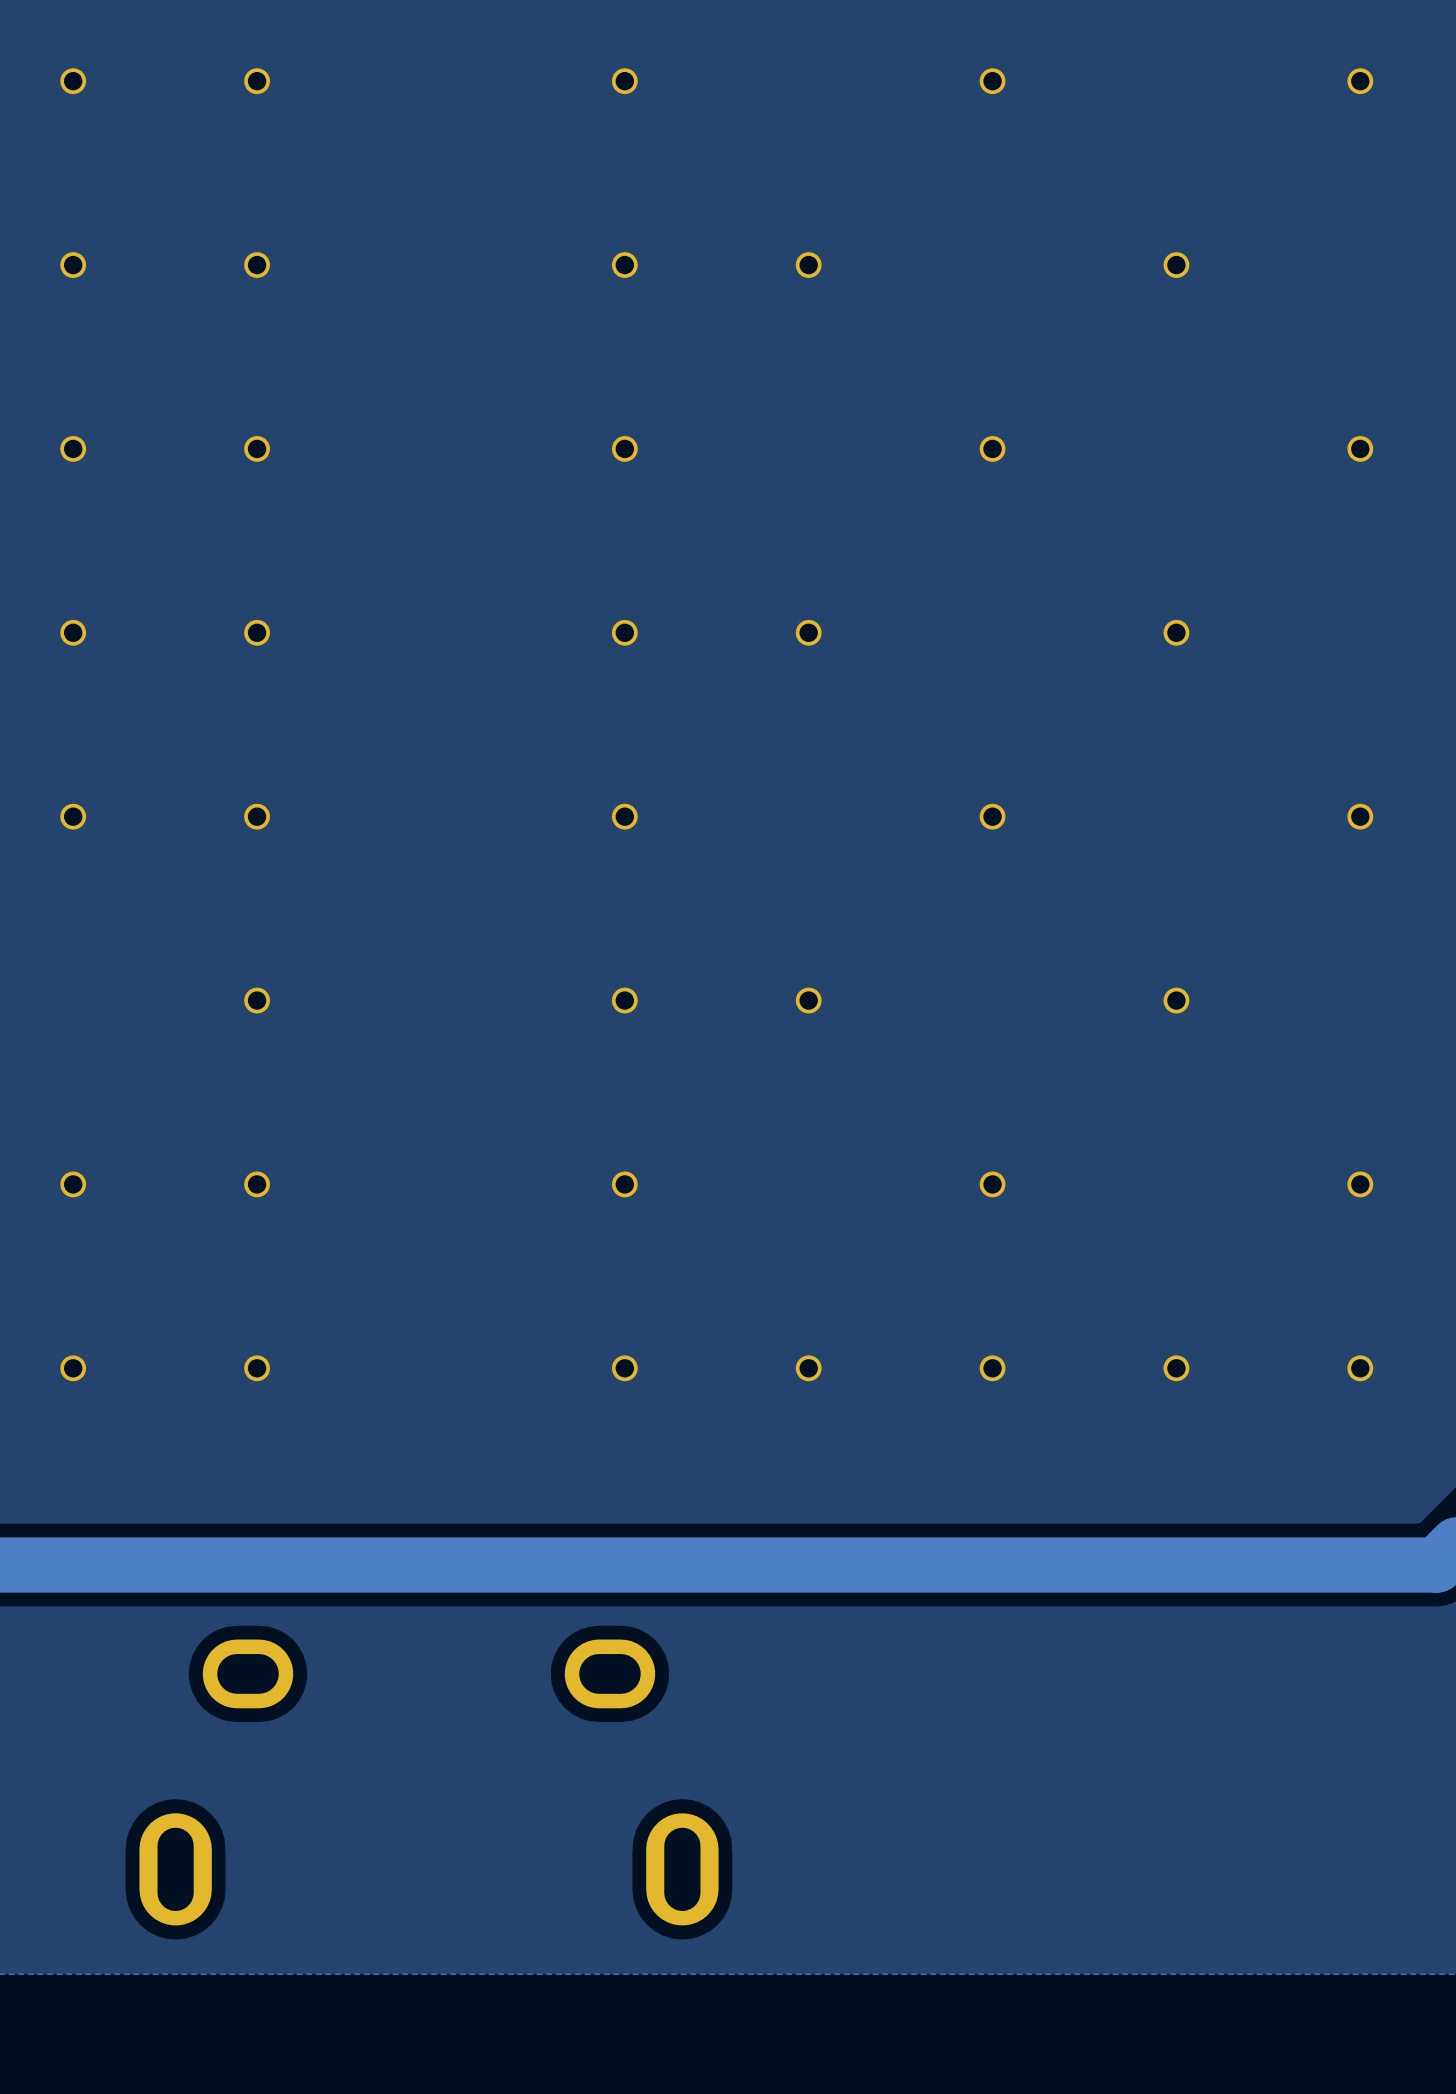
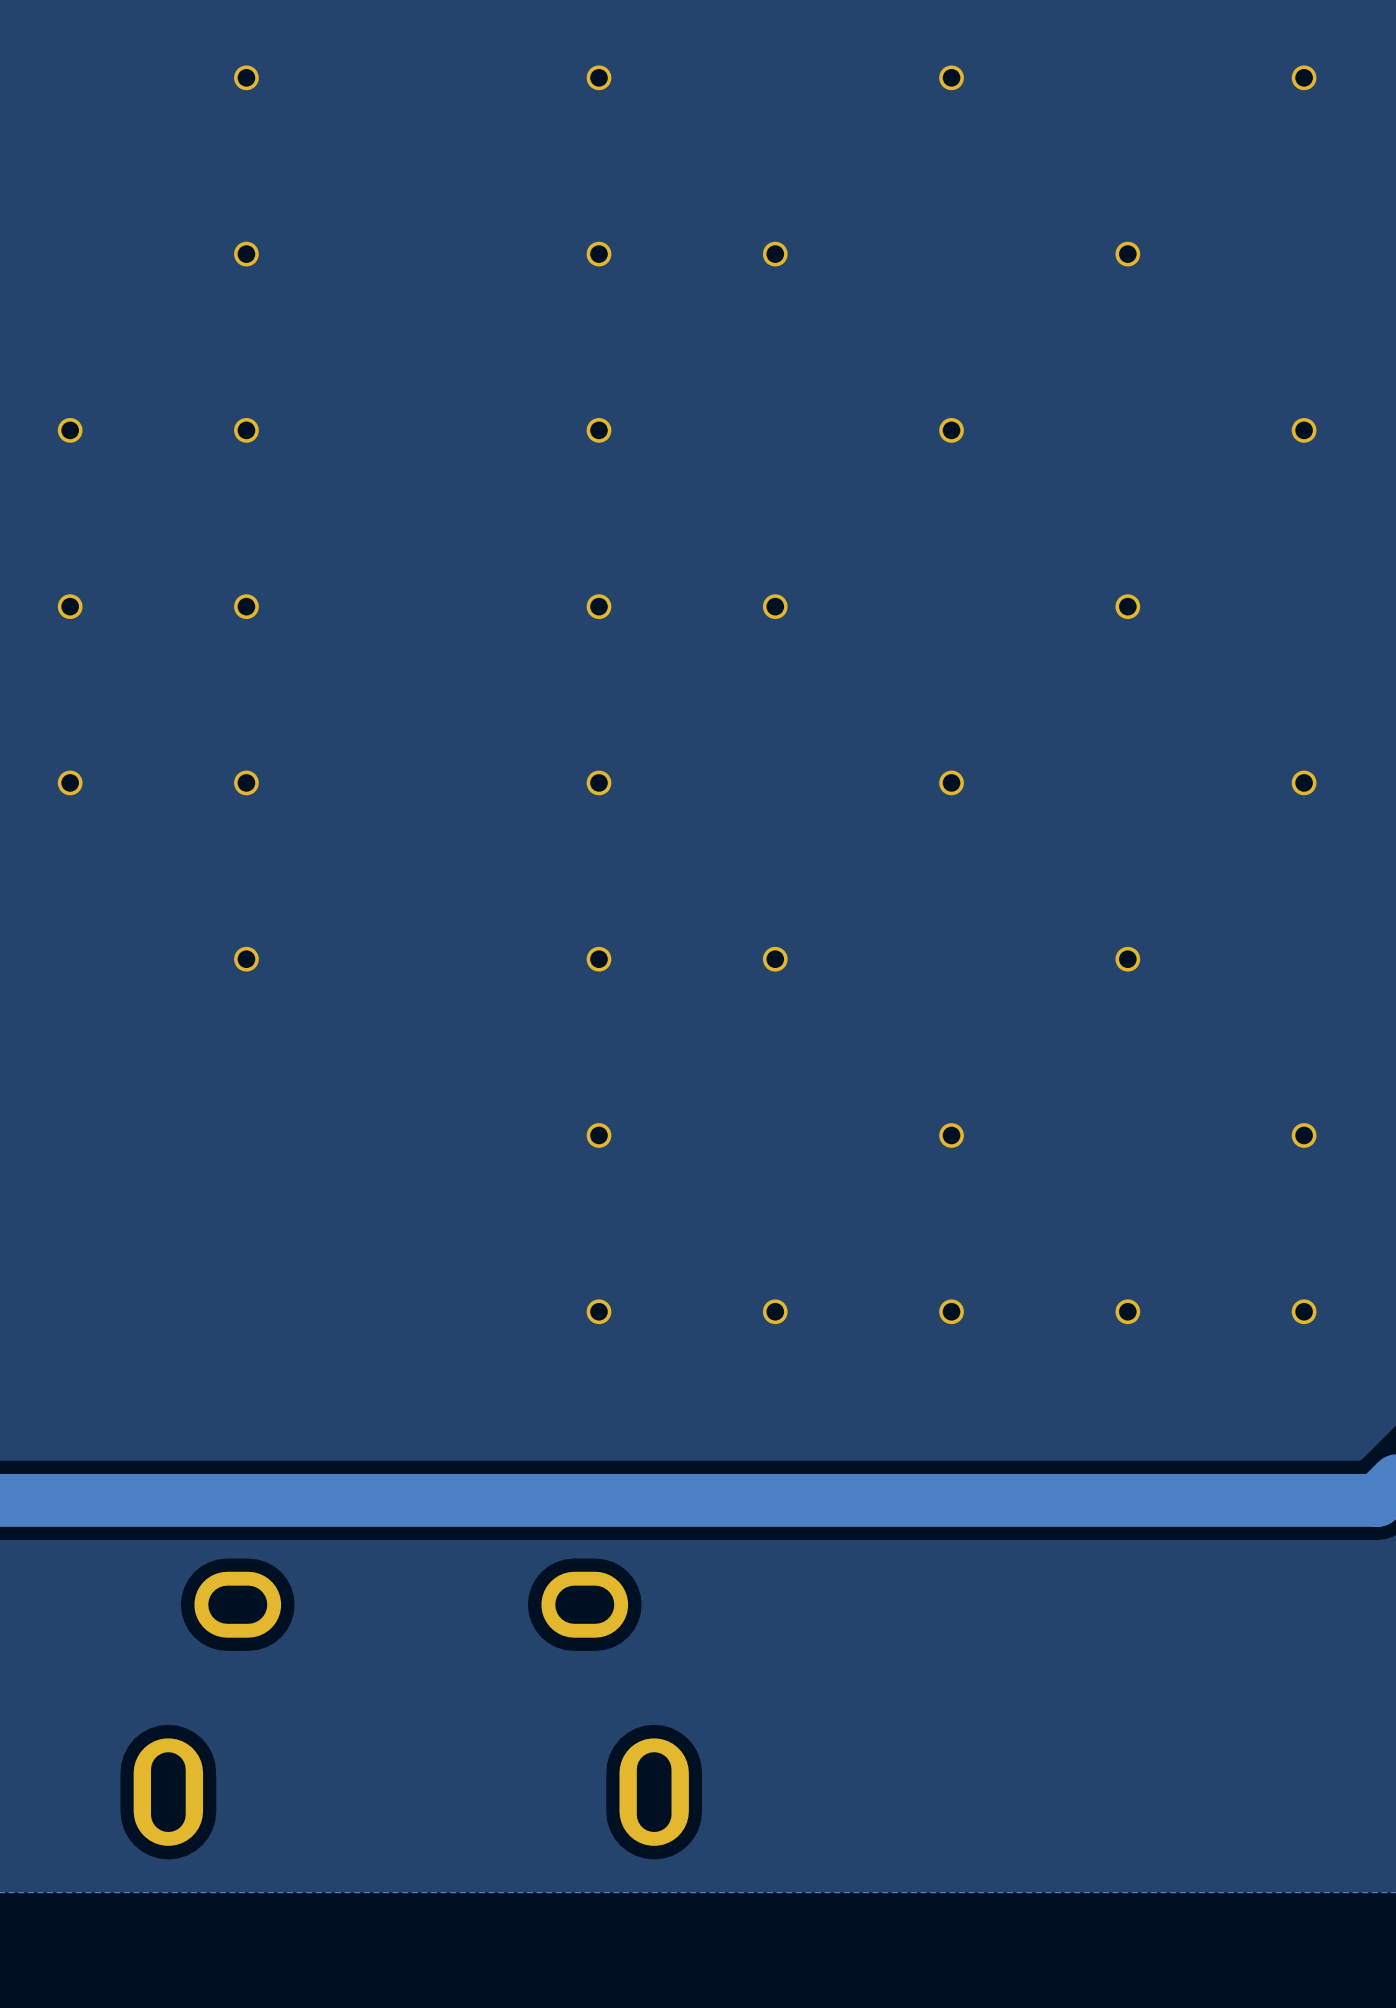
part: (73, 81) -> none
part: (73, 265) -> none
part: (73, 1184) -> none
part: (257, 1184) -> none
part: (73, 1368) -> none
part: (257, 1368) -> none

